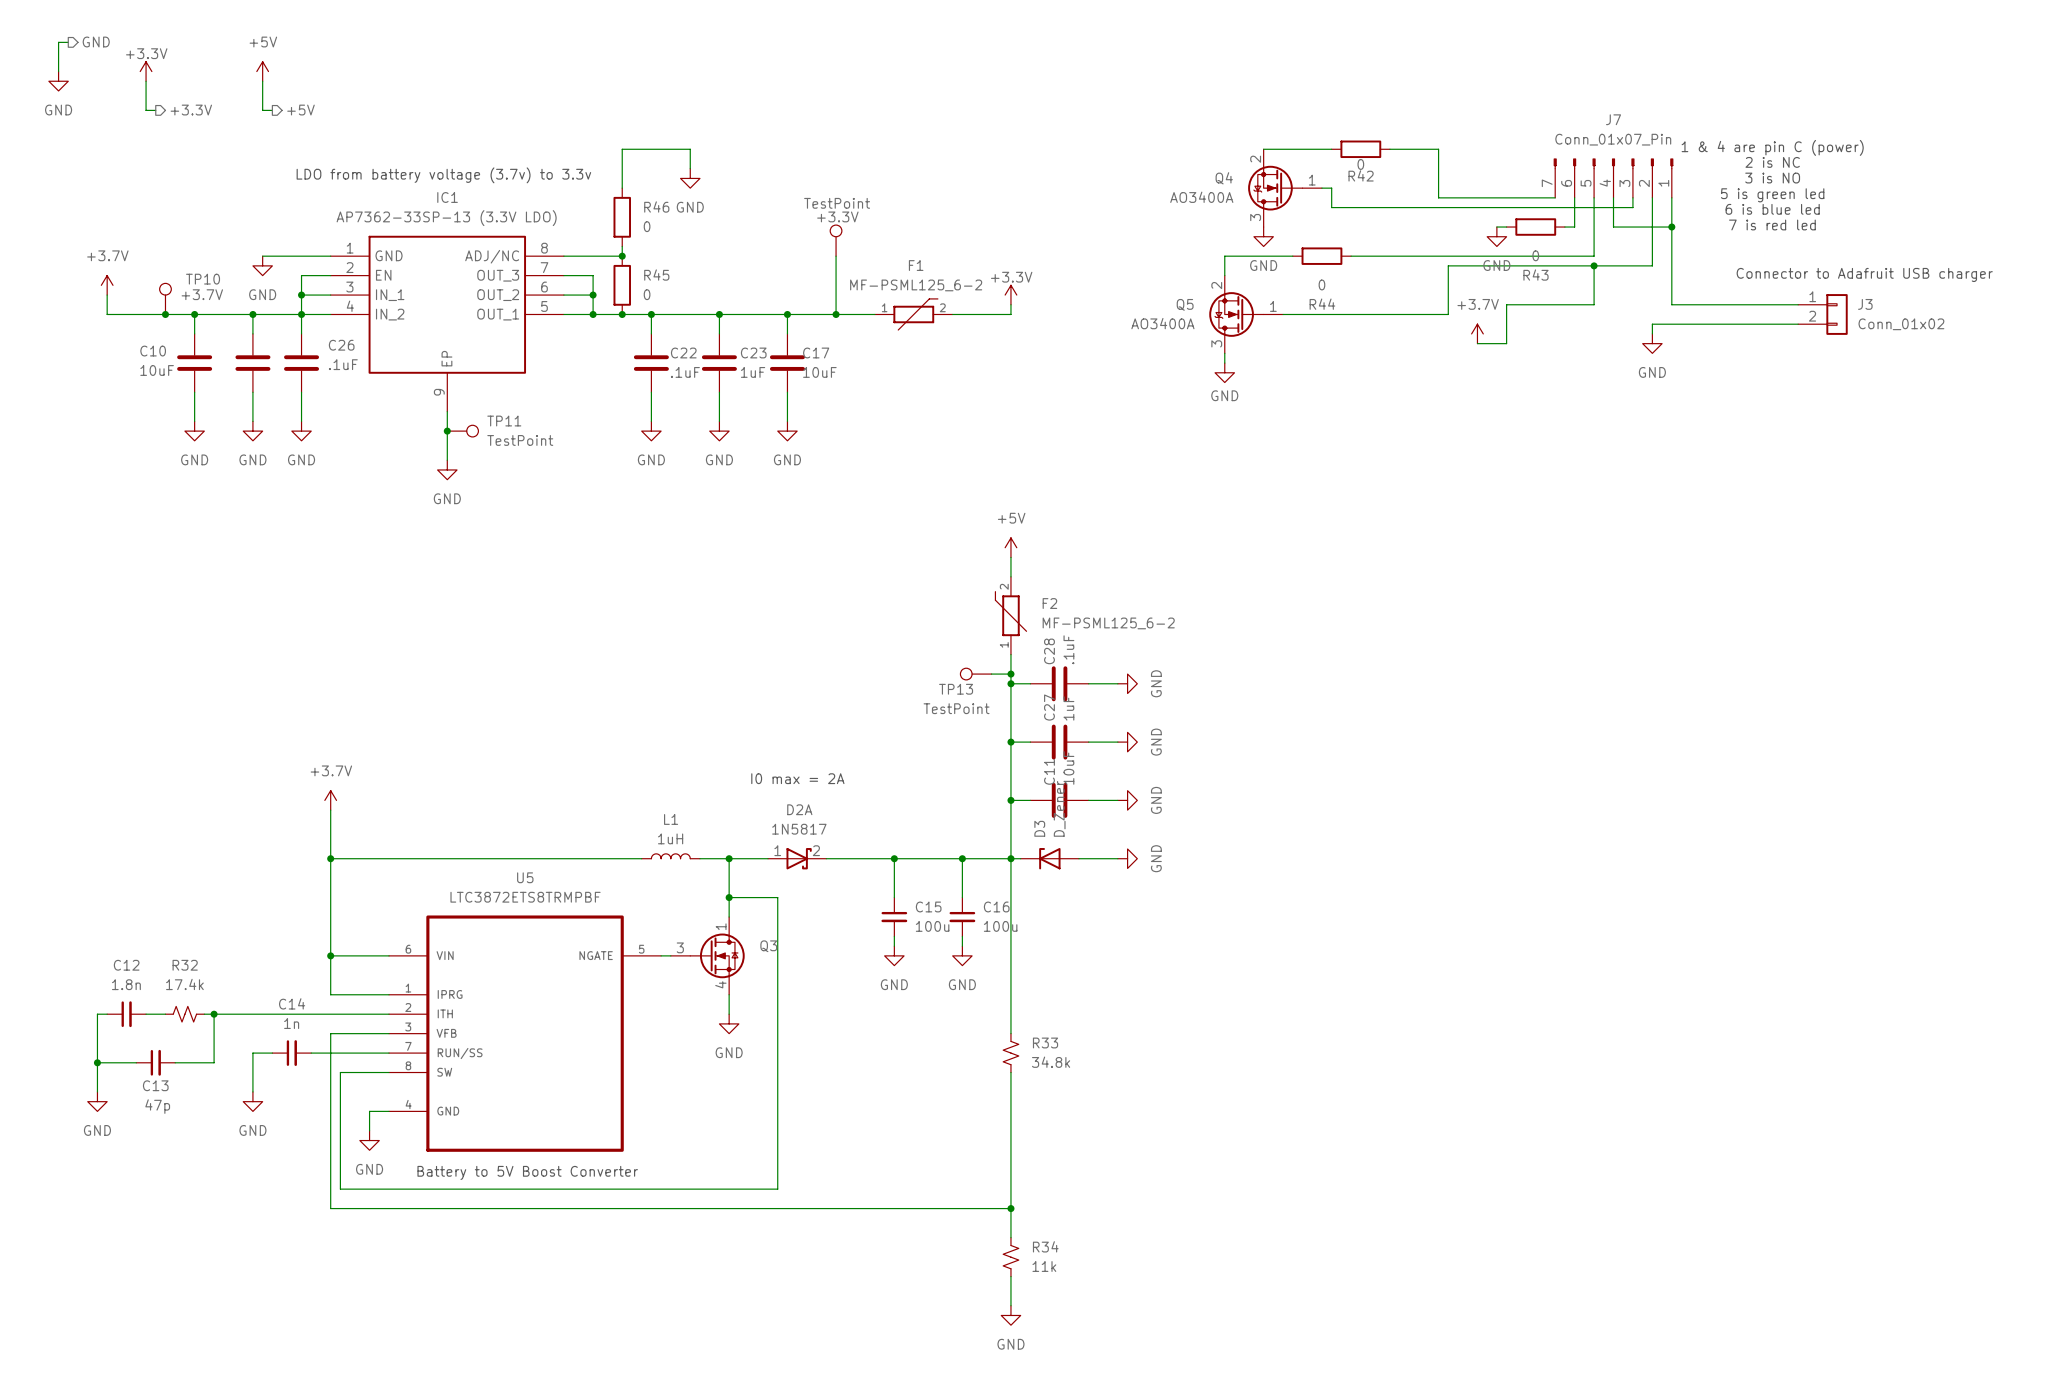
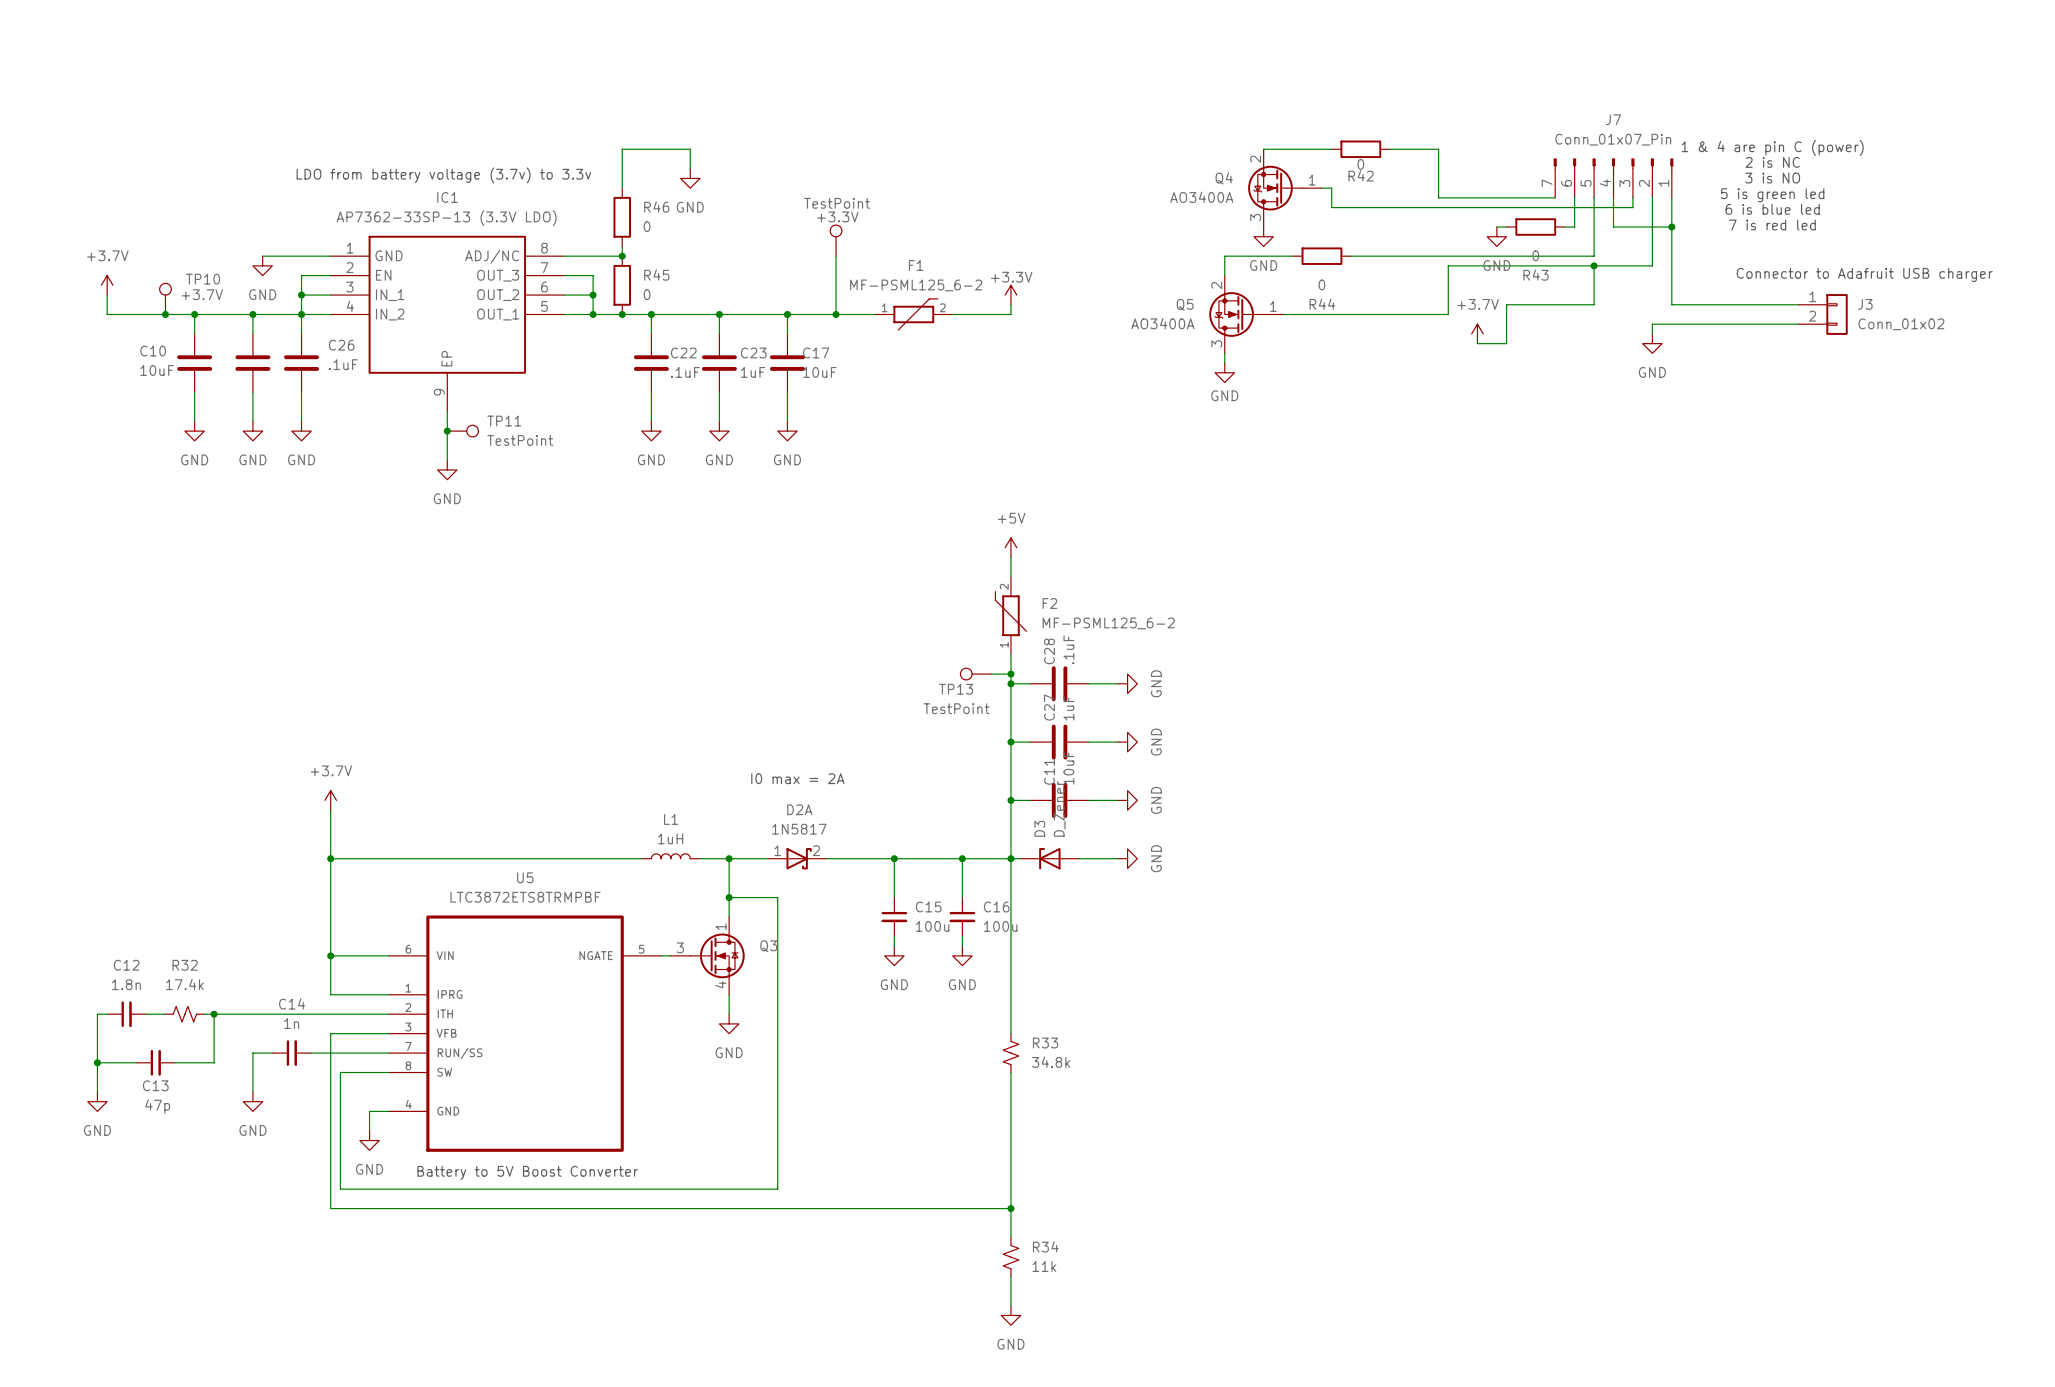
wire: (68, 42) (58, 42) (58, 71) -> none
hierarchical label: GND (96, 42) -> none
power symbol: +3.3V (146, 71) -> none
power symbol: +5V (262, 71) -> none
power symbol: GND (58, 81) -> none
wire: (146, 81) (146, 110) (155, 110) -> none
wire: (262, 81) (262, 110) (272, 110) -> none
hierarchical label: +3.3V (191, 110) -> none
hierarchical label: +5V (300, 110) -> none

